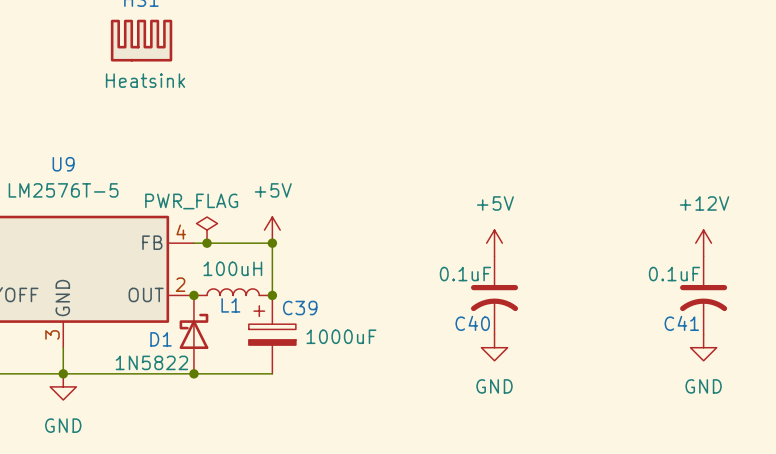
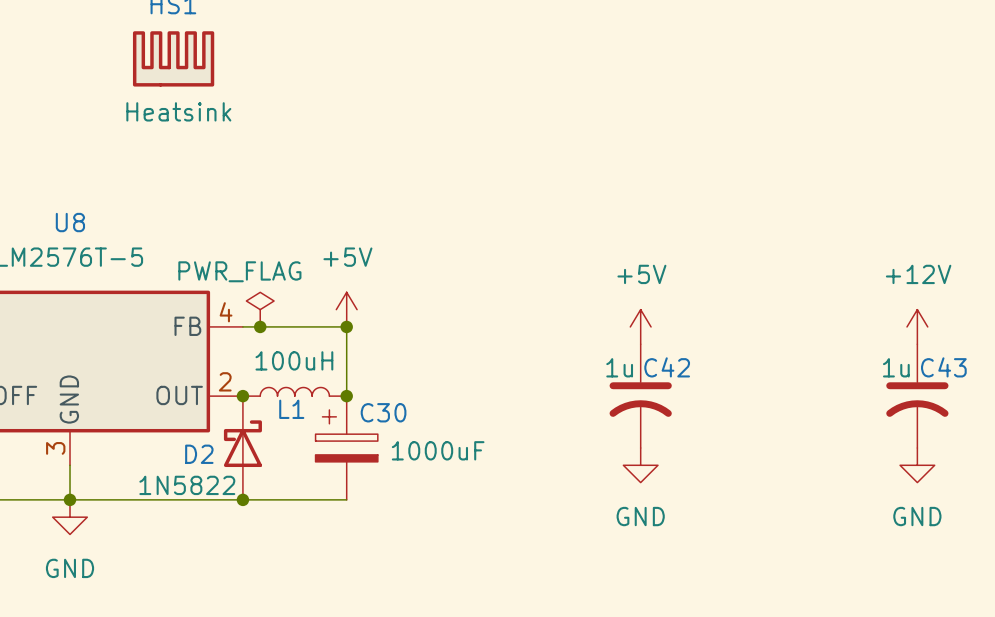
U9 name: U9 (63, 164) -> U8 (70, 222)
C40 value: 0.1uF (465, 274) -> 1u (619, 367)
C41 value: 0.1uF (674, 274) -> 1u (896, 367)
C39 name: C39 (300, 308) -> C30 (383, 412)
C40 name: C40 (472, 323) -> C42 (667, 367)
C41 name: C41 (681, 323) -> C43 (943, 367)
D1 name: D1 (161, 339) -> D2 (199, 454)

